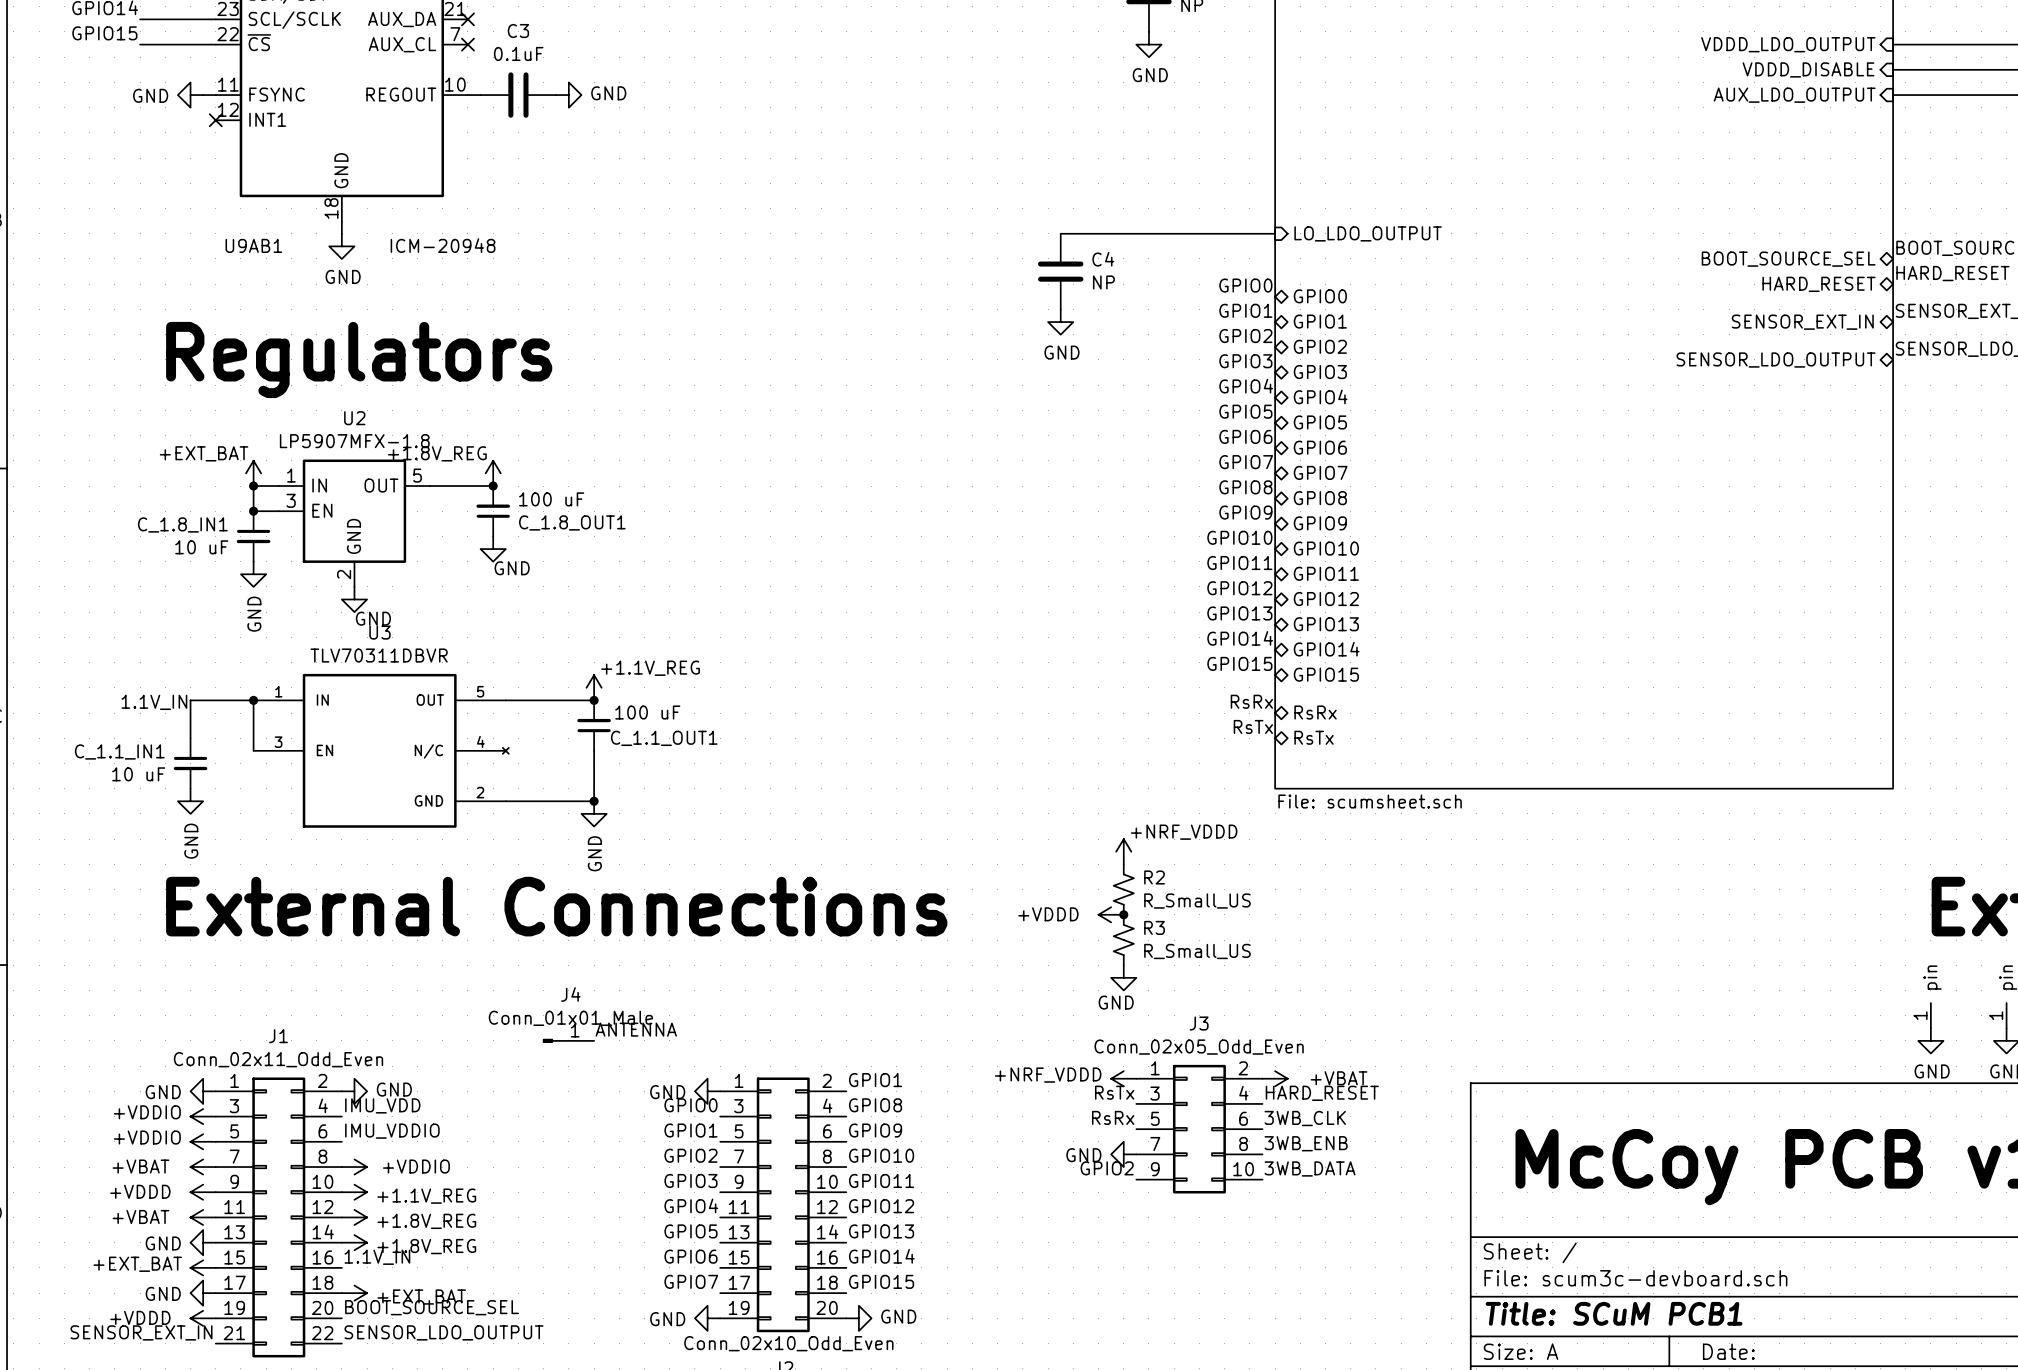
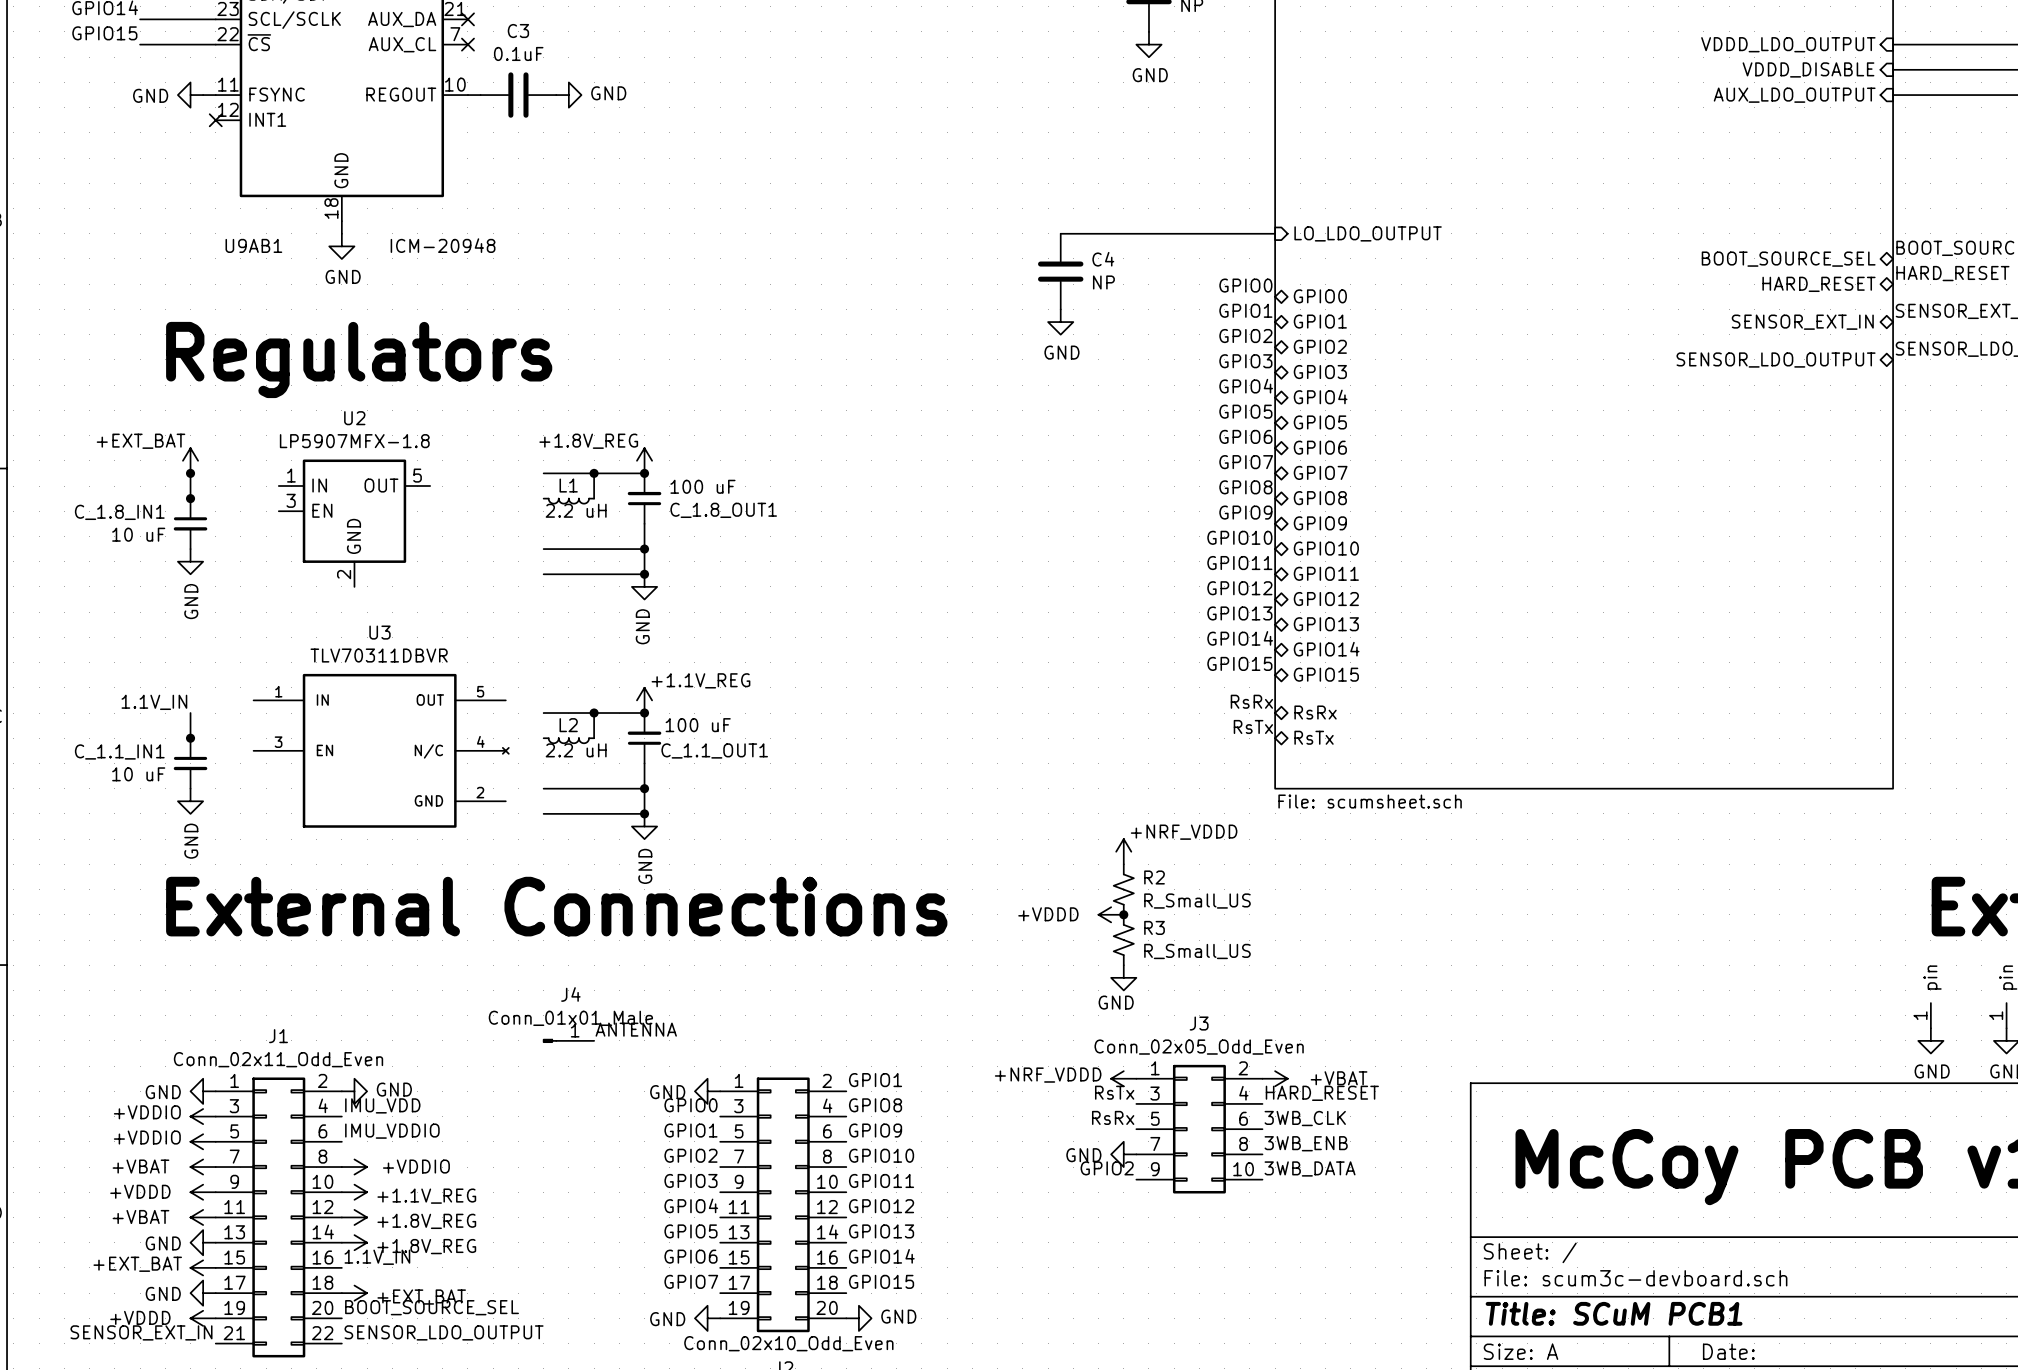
wire: none -> (190, 473) (190, 498)
junction: none -> (190, 473)
power symbol position: +EXT_BAT (253, 473) -> +EXT_BAT (190, 460)
power symbol position: +1.8V_REG (493, 473) -> +1.8V_REG (644, 460)
wire: none -> (543, 473) (644, 473)
wire: none -> (594, 473) (594, 498)
junction: none -> (594, 473)
junction: none -> (644, 473)
junction: (253, 486) -> none
wire: (278, 486) (253, 486) (253, 511) (278, 511) -> none
wire: (430, 486) (493, 486) -> none
junction: (493, 486) -> none
junction: none -> (190, 498)
L1: none -> 2.2 uH (568, 501)
junction: (253, 511) -> none
C_1.8_OUT1 position: (493, 511) -> (644, 498)
wire: none -> (644, 523) (644, 574) (543, 574)
C_1.8_IN1 position: (253, 536) -> (190, 523)
power symbol: GND (493, 549) -> none
wire: none -> (543, 549) (644, 549)
junction: none -> (644, 549)
power symbol position: GND (253, 574) -> GND (190, 561)
junction: none -> (644, 574)
power symbol: none -> GND (644, 586)
power symbol: GND (354, 599) -> none
power symbol position: +1.1V_REG (594, 687) -> +1.1V_REG (644, 700)
junction: (253, 700) -> none
wire: (505, 700) (594, 700) -> none
junction position: (594, 700) -> (594, 713)
wire: (190, 713) (190, 700) (253, 700) (253, 750) -> none
wire: none -> (543, 713) (644, 713)
junction: none -> (644, 713)
C_1.1_OUT1 position: (594, 725) -> (644, 738)
junction: none -> (190, 738)
L2: none -> 2.2 uH (568, 740)
wire: (594, 750) (594, 801) (505, 801) -> none
wire: none -> (644, 763) (644, 813) (543, 813)
wire: none -> (543, 788) (644, 788)
junction: none -> (644, 788)
junction: (594, 801) -> none
power symbol position: GND (594, 813) -> GND (644, 826)
junction: none -> (644, 813)

